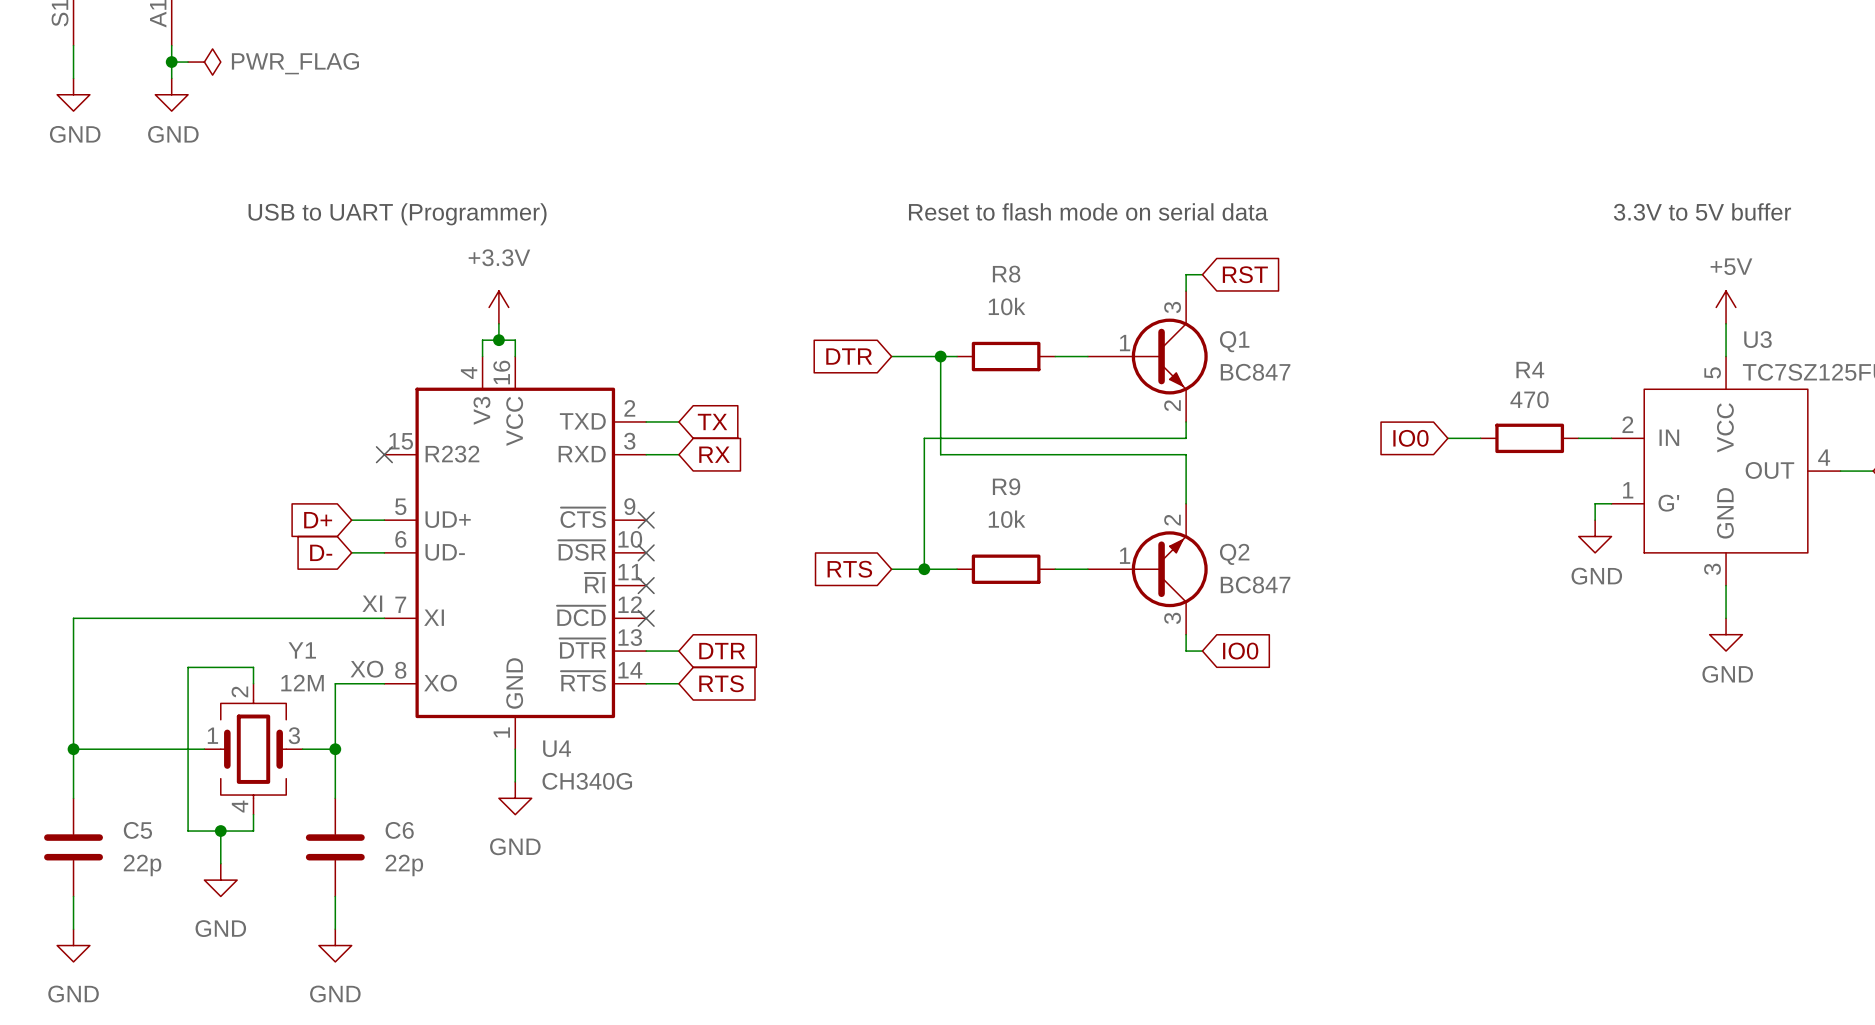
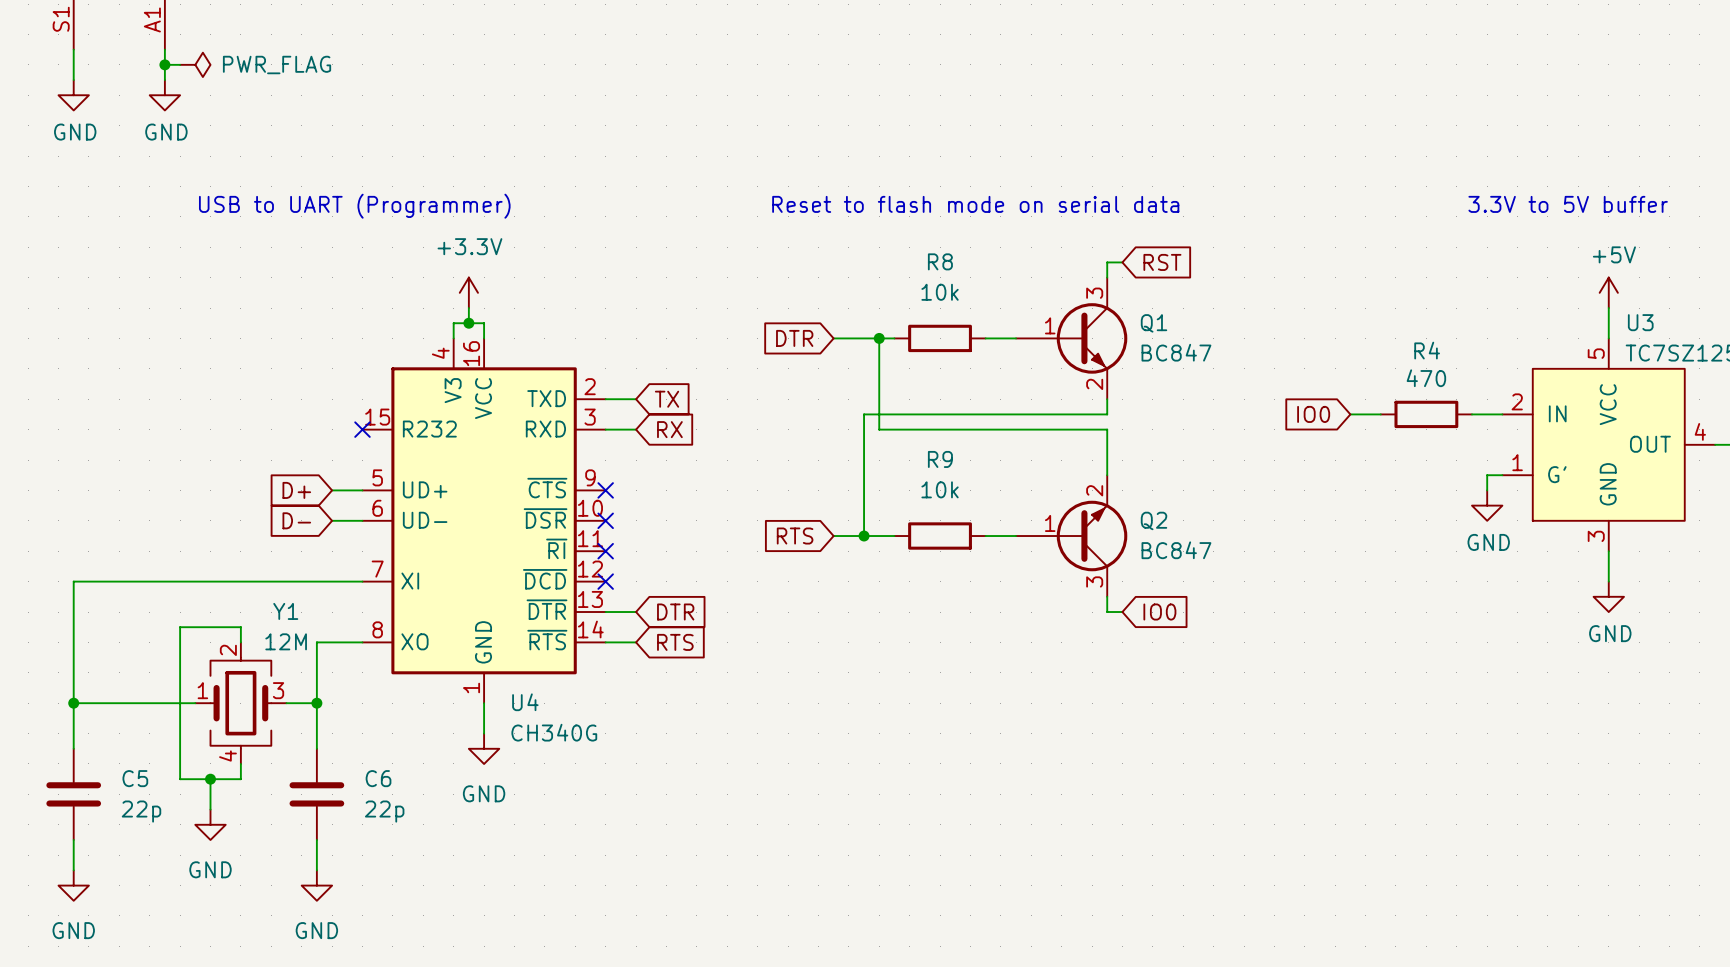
label: XI (372, 603) -> none
label: XO (366, 669) -> none

